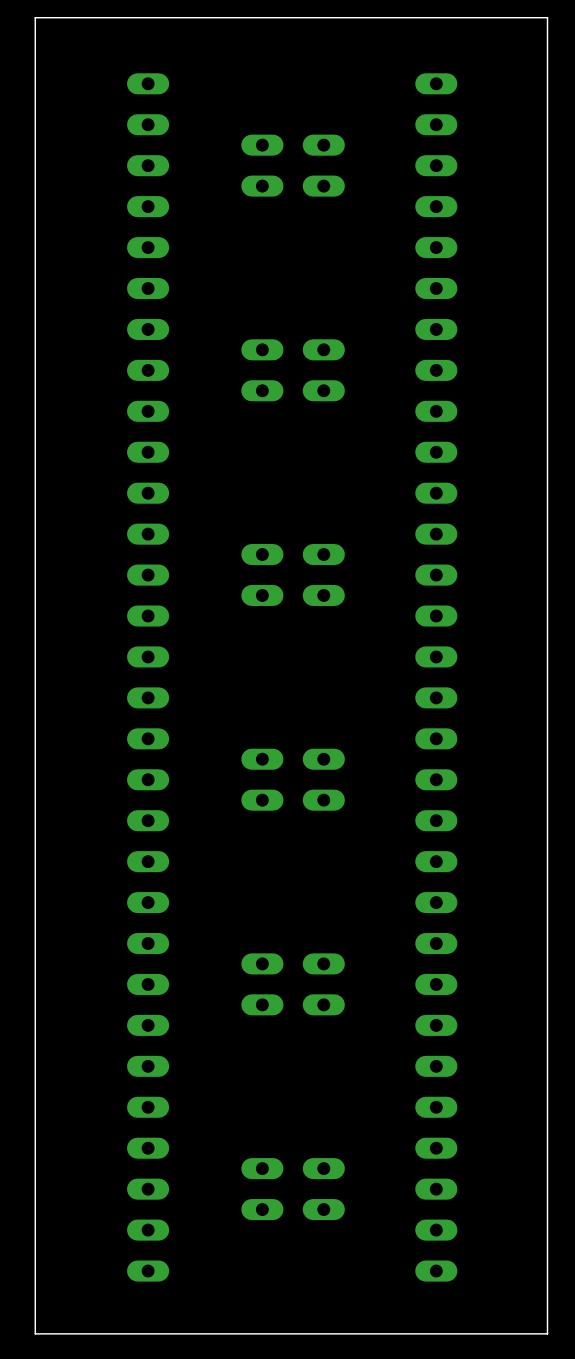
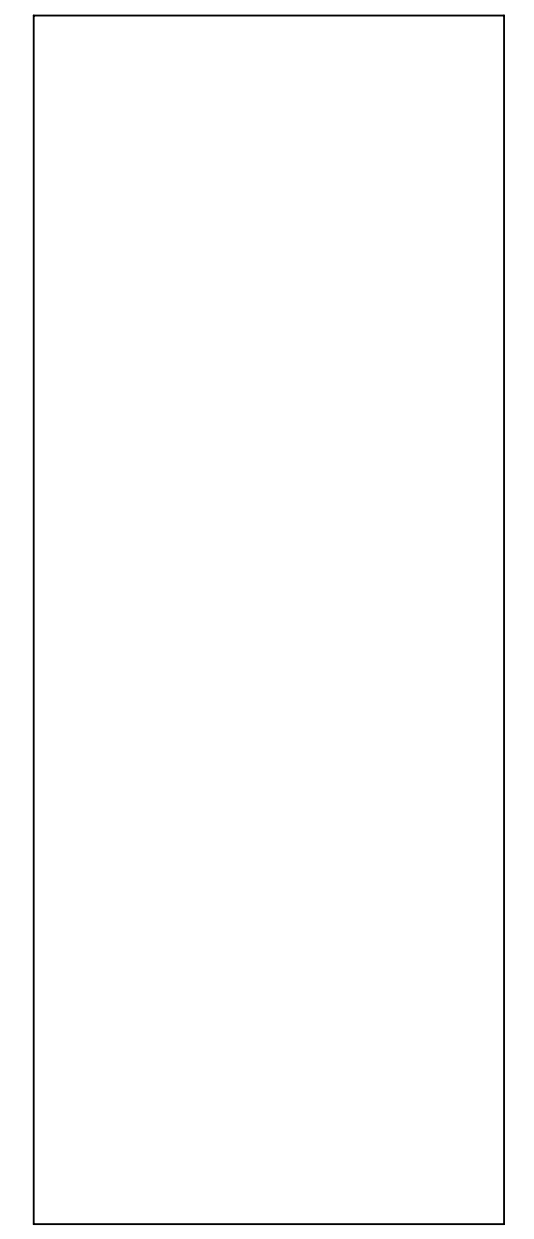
part: (148, 83) -> none
part: (436, 83) -> none
part: (148, 124) -> none
part: (436, 124) -> none
part: (262, 145) -> none
part: (323, 145) -> none
part: (148, 165) -> none
part: (436, 165) -> none
part: (262, 186) -> none
part: (323, 186) -> none
part: (148, 206) -> none
part: (436, 206) -> none
part: (148, 247) -> none
part: (436, 247) -> none
part: (148, 288) -> none
part: (436, 288) -> none
part: (148, 329) -> none
part: (436, 329) -> none
part: (262, 349) -> none
part: (323, 349) -> none
part: (148, 370) -> none
part: (436, 370) -> none
part: (262, 390) -> none
part: (323, 390) -> none
part: (148, 411) -> none
part: (436, 411) -> none
part: (148, 452) -> none
part: (436, 452) -> none
part: (148, 493) -> none
part: (436, 493) -> none
part: (148, 534) -> none
part: (436, 534) -> none
part: (262, 554) -> none
part: (323, 554) -> none
part: (148, 575) -> none
part: (436, 575) -> none
part: (262, 595) -> none
part: (323, 595) -> none
part: (148, 616) -> none
part: (436, 616) -> none
part: (148, 656) -> none
part: (436, 656) -> none
part: (148, 697) -> none
part: (436, 697) -> none
part: (148, 738) -> none
part: (436, 738) -> none
part: (262, 759) -> none
part: (323, 759) -> none
part: (148, 779) -> none
part: (436, 779) -> none
part: (262, 800) -> none
part: (323, 800) -> none
part: (148, 820) -> none
part: (436, 820) -> none
part: (148, 861) -> none
part: (436, 861) -> none
part: (148, 902) -> none
part: (436, 902) -> none
part: (148, 943) -> none
part: (436, 943) -> none
part: (262, 963) -> none
part: (323, 963) -> none
part: (148, 984) -> none
part: (436, 984) -> none
part: (262, 1004) -> none
part: (323, 1004) -> none
part: (148, 1025) -> none
part: (436, 1025) -> none
part: (148, 1066) -> none
part: (436, 1066) -> none
part: (148, 1107) -> none
part: (436, 1107) -> none
part: (148, 1148) -> none
part: (436, 1148) -> none
part: (262, 1168) -> none
part: (323, 1168) -> none
part: (148, 1189) -> none
part: (436, 1189) -> none
part: (262, 1209) -> none
part: (323, 1209) -> none
part: (148, 1230) -> none
part: (436, 1230) -> none
part: (148, 1271) -> none
part: (436, 1271) -> none

